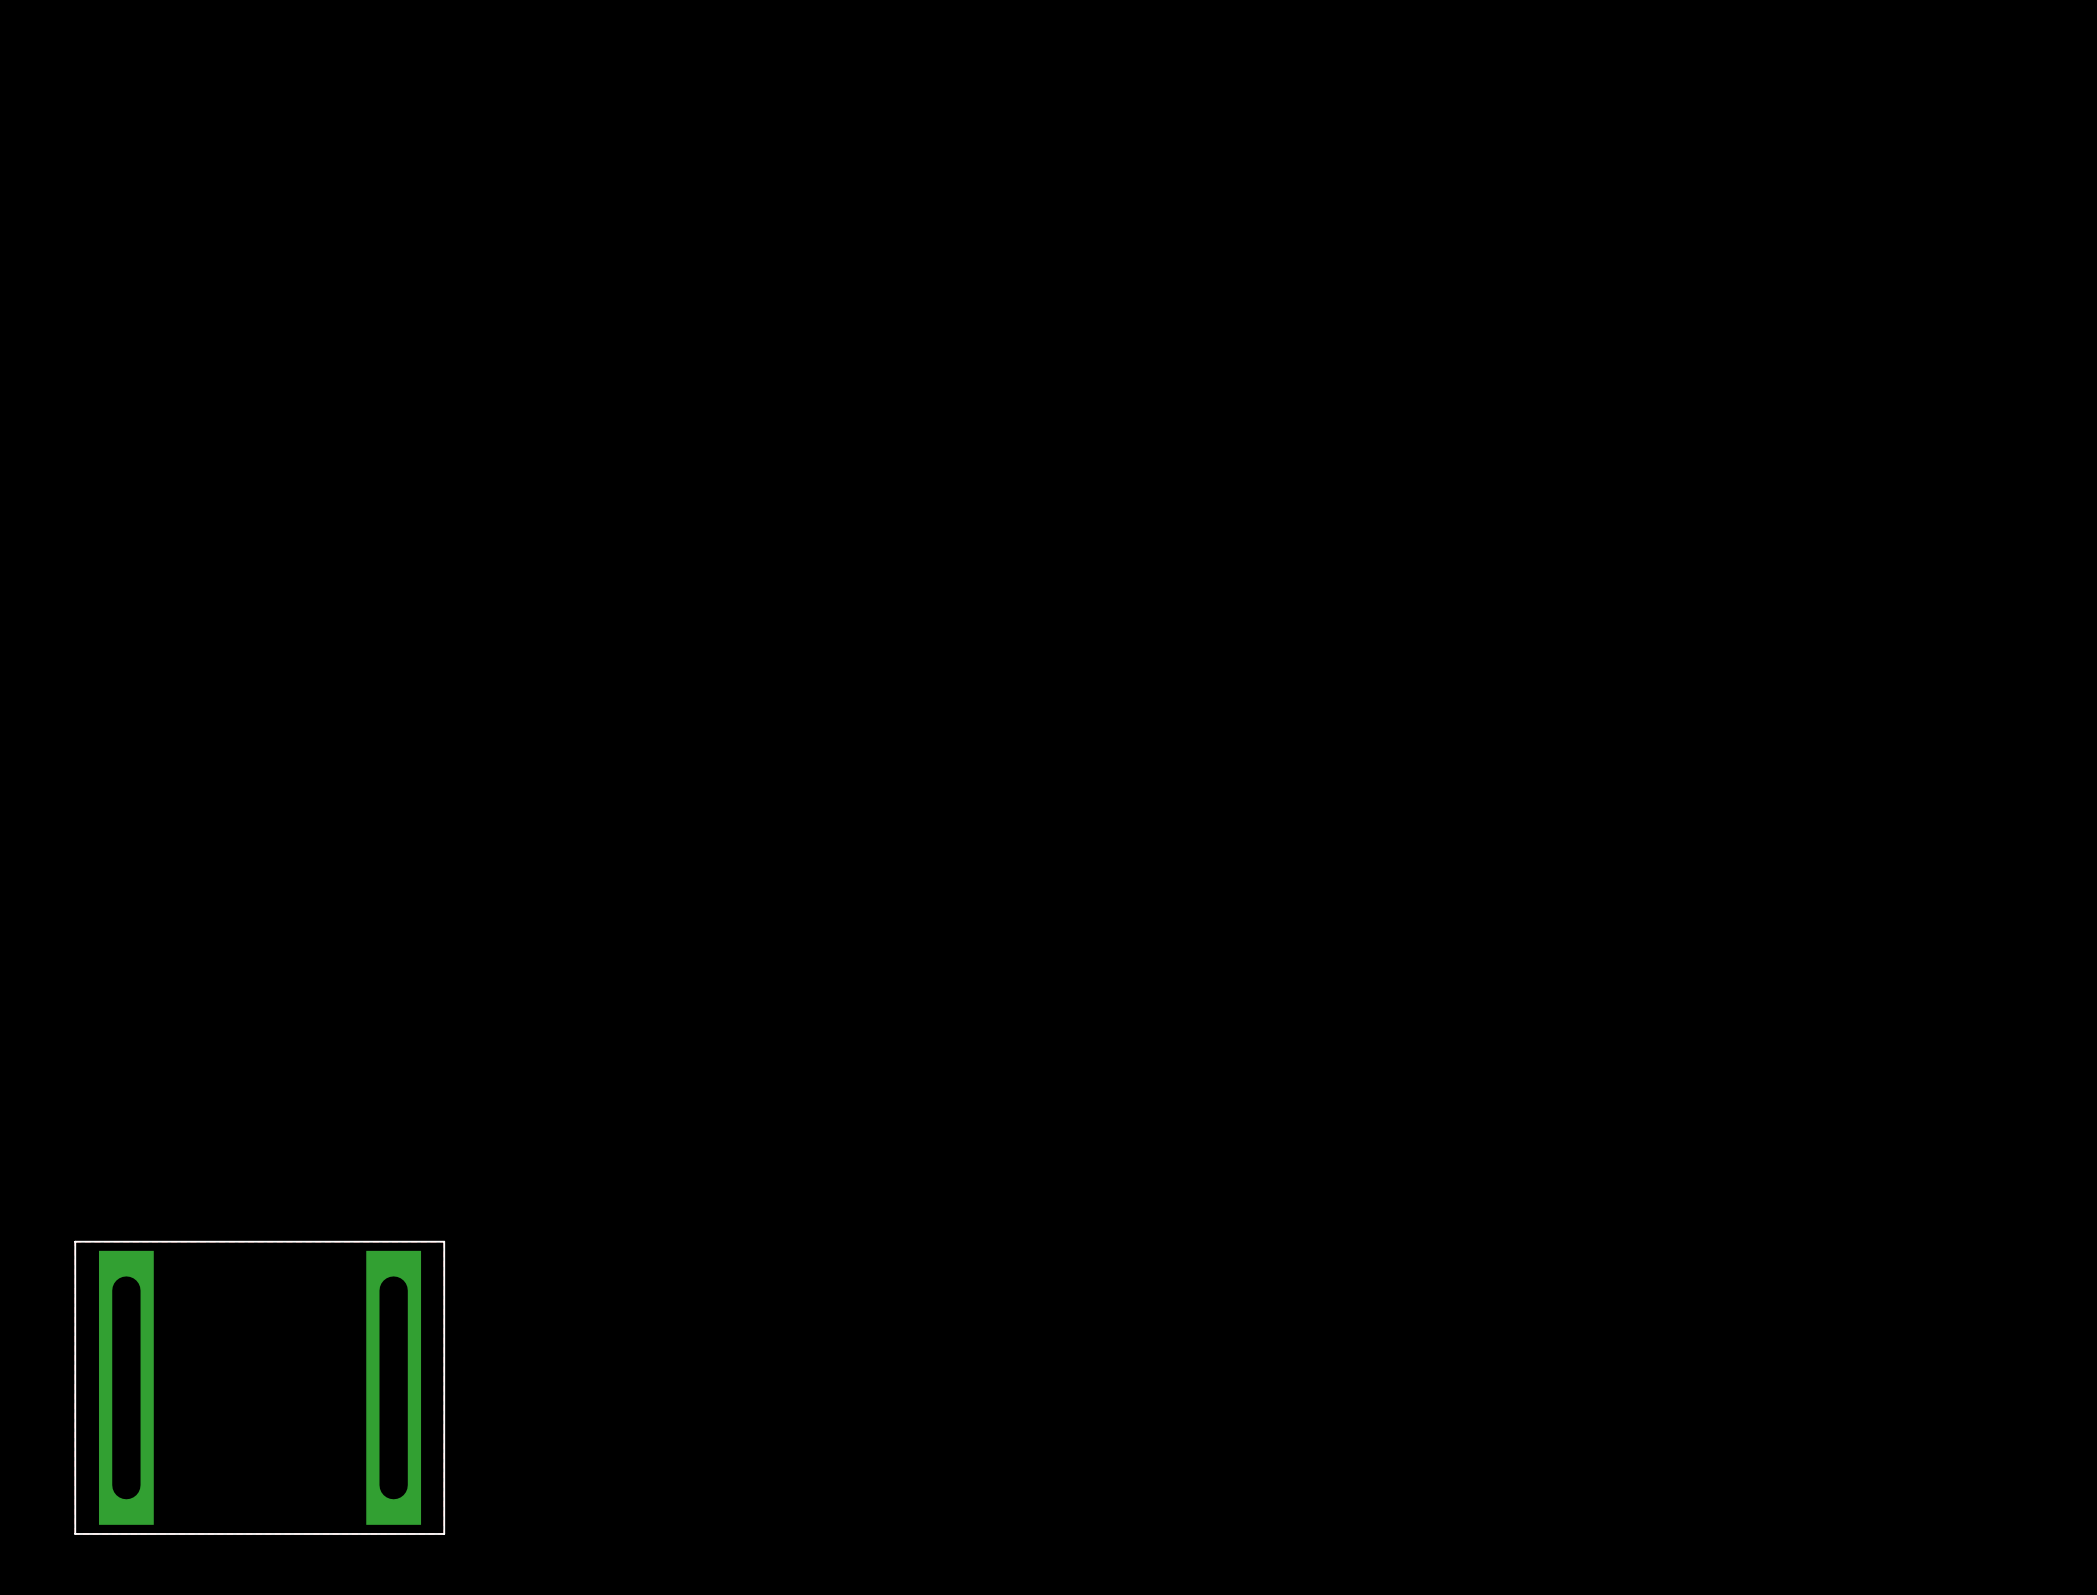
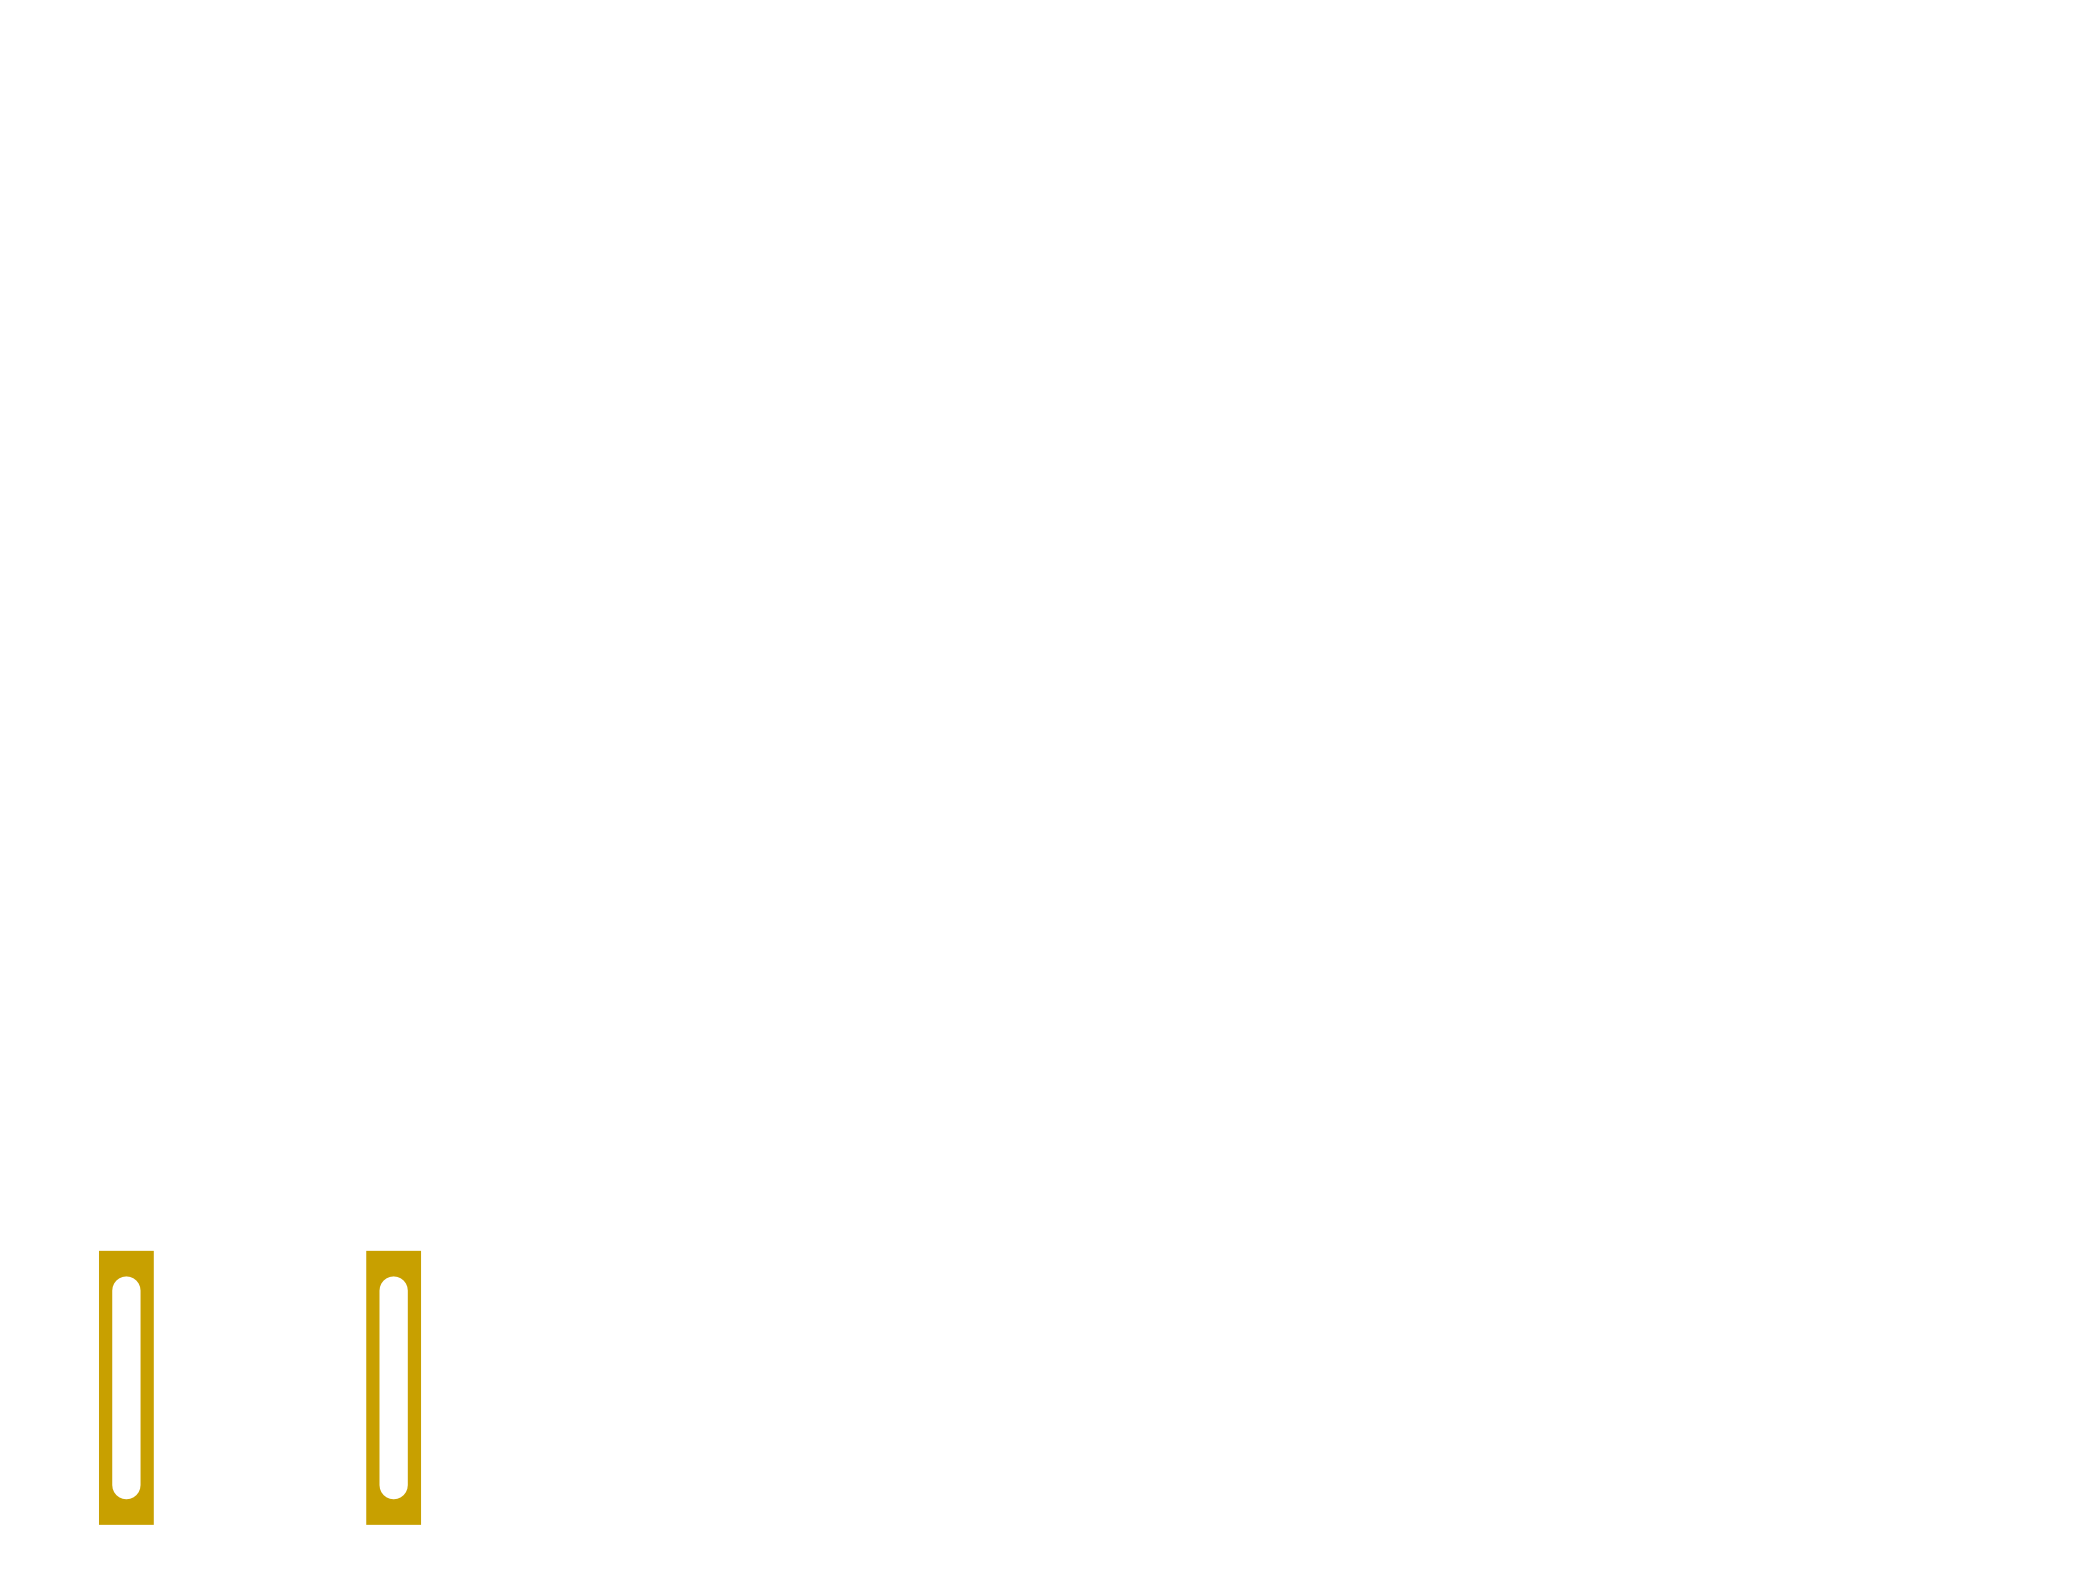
board edge: (444, 1241) (75, 1241) (75, 1533) (444, 1533) (444, 1241) -> none

